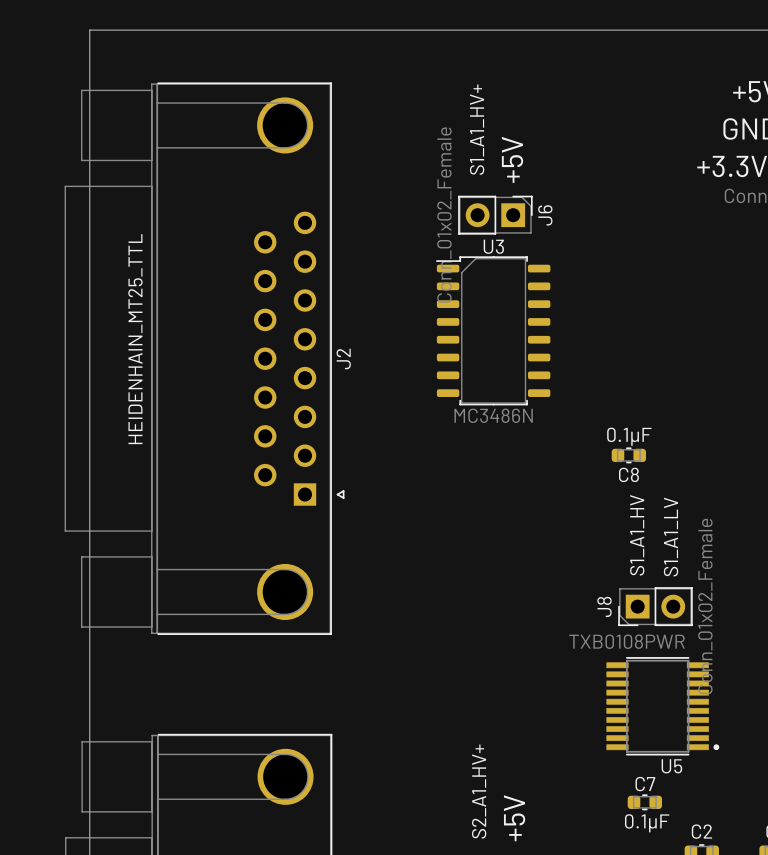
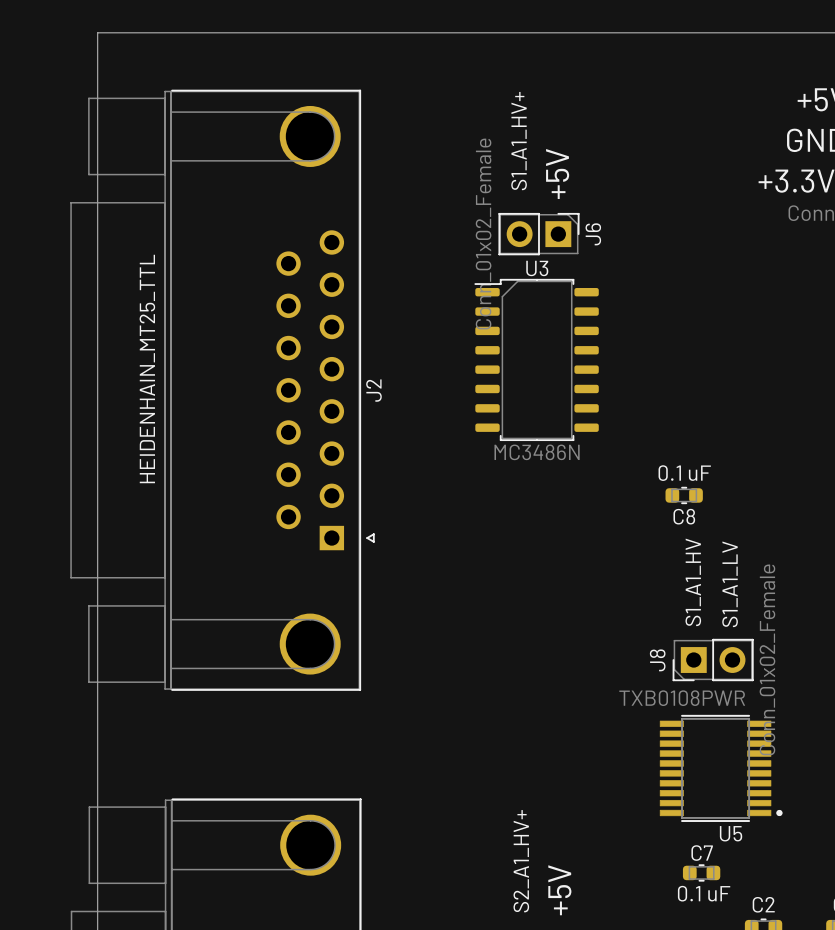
C8 value: 0.1μF (629, 436) -> 0.1 uF (684, 473)
C7 value: 0.1μF (647, 823) -> 0.1 uF (704, 893)

